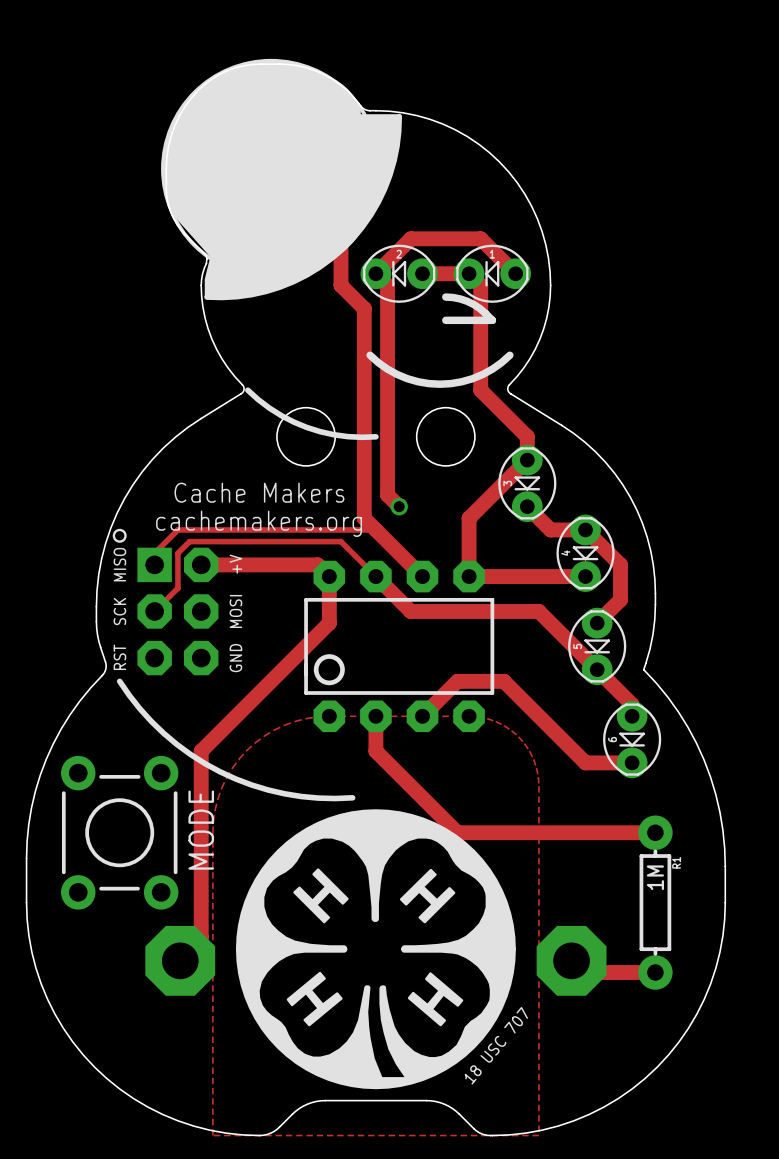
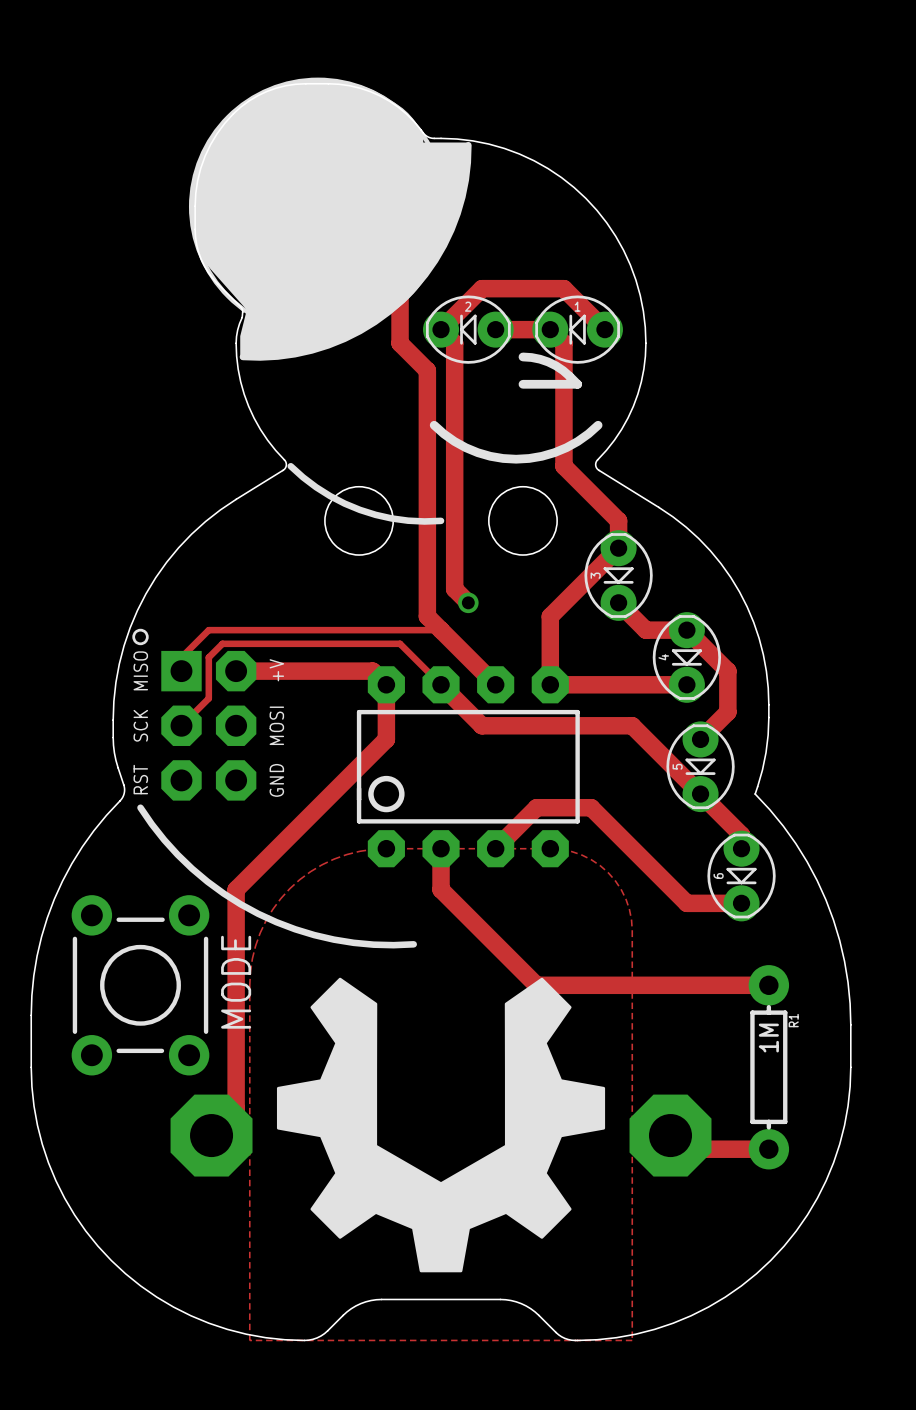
text: Cache Makers (259, 492) -> none
text: cachemakers.org (259, 523) -> none
drawing shape: [235, 809, 528, 1090] -> [276, 977, 606, 1273]

